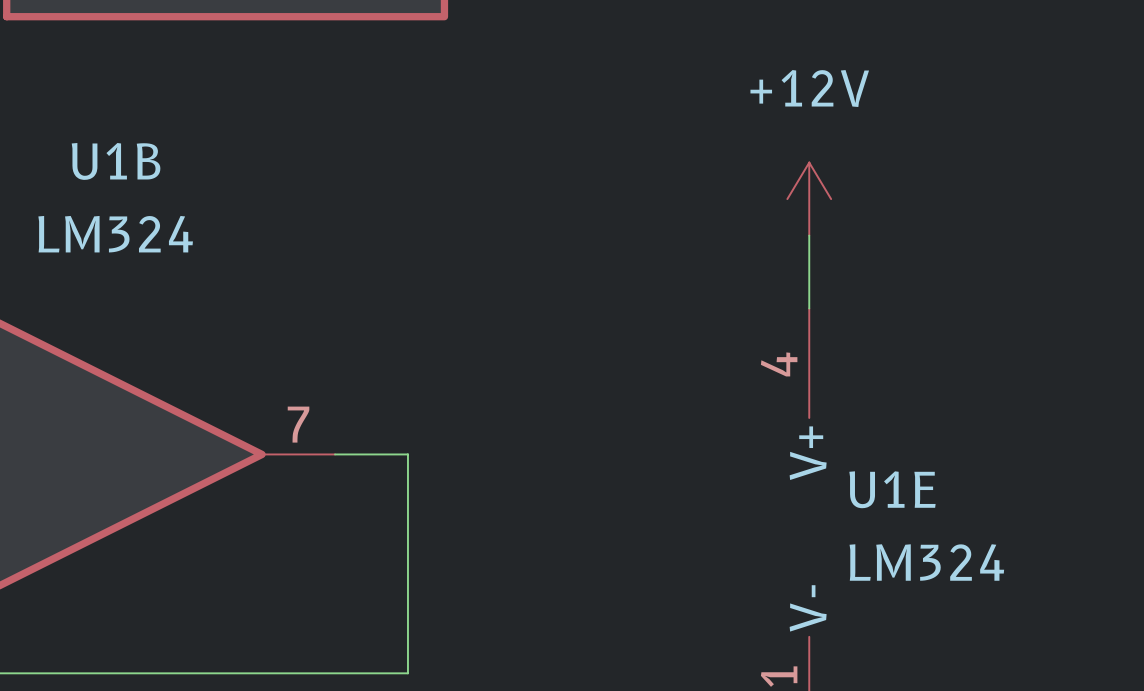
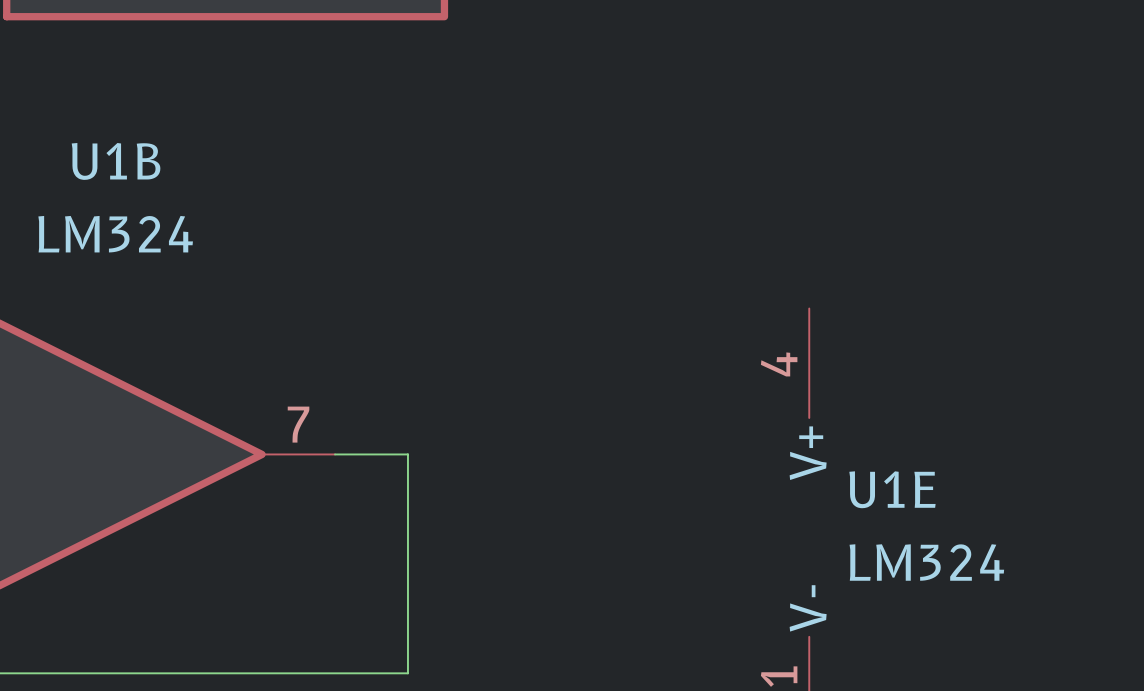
power symbol: +12V (809, 199) -> none
wire: (809, 235) (809, 308) -> none

